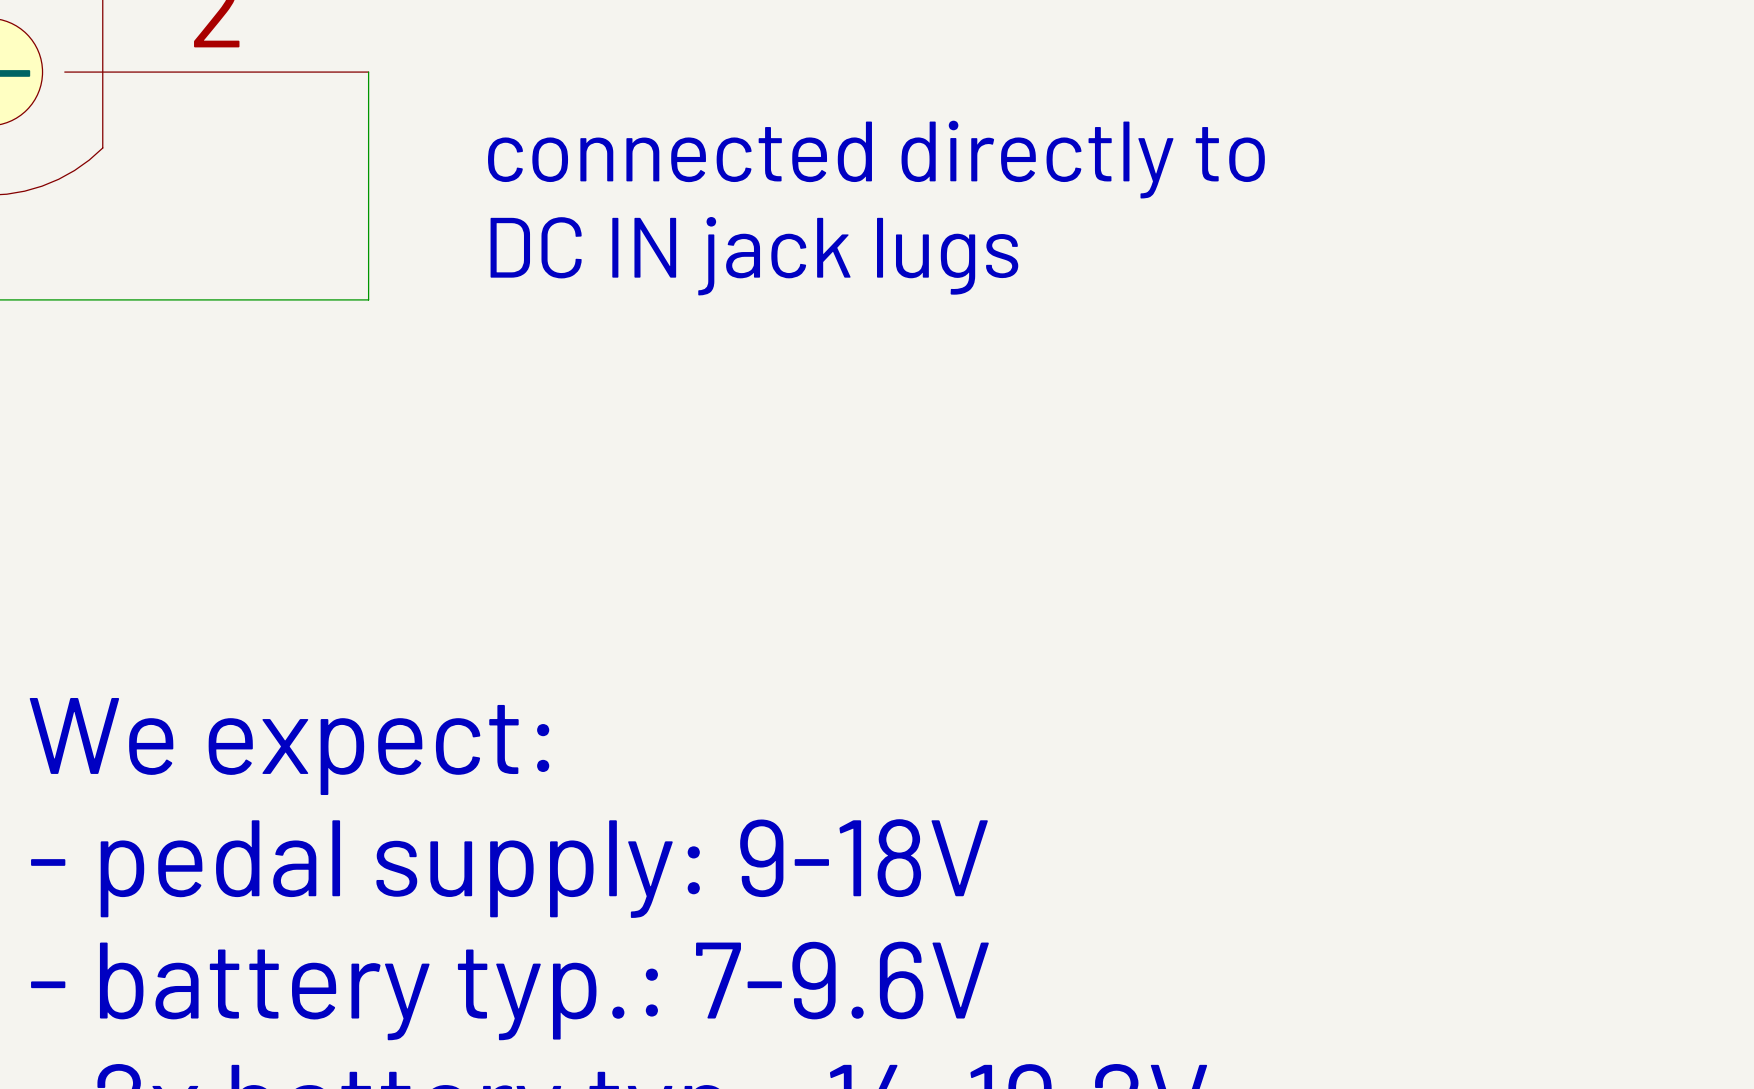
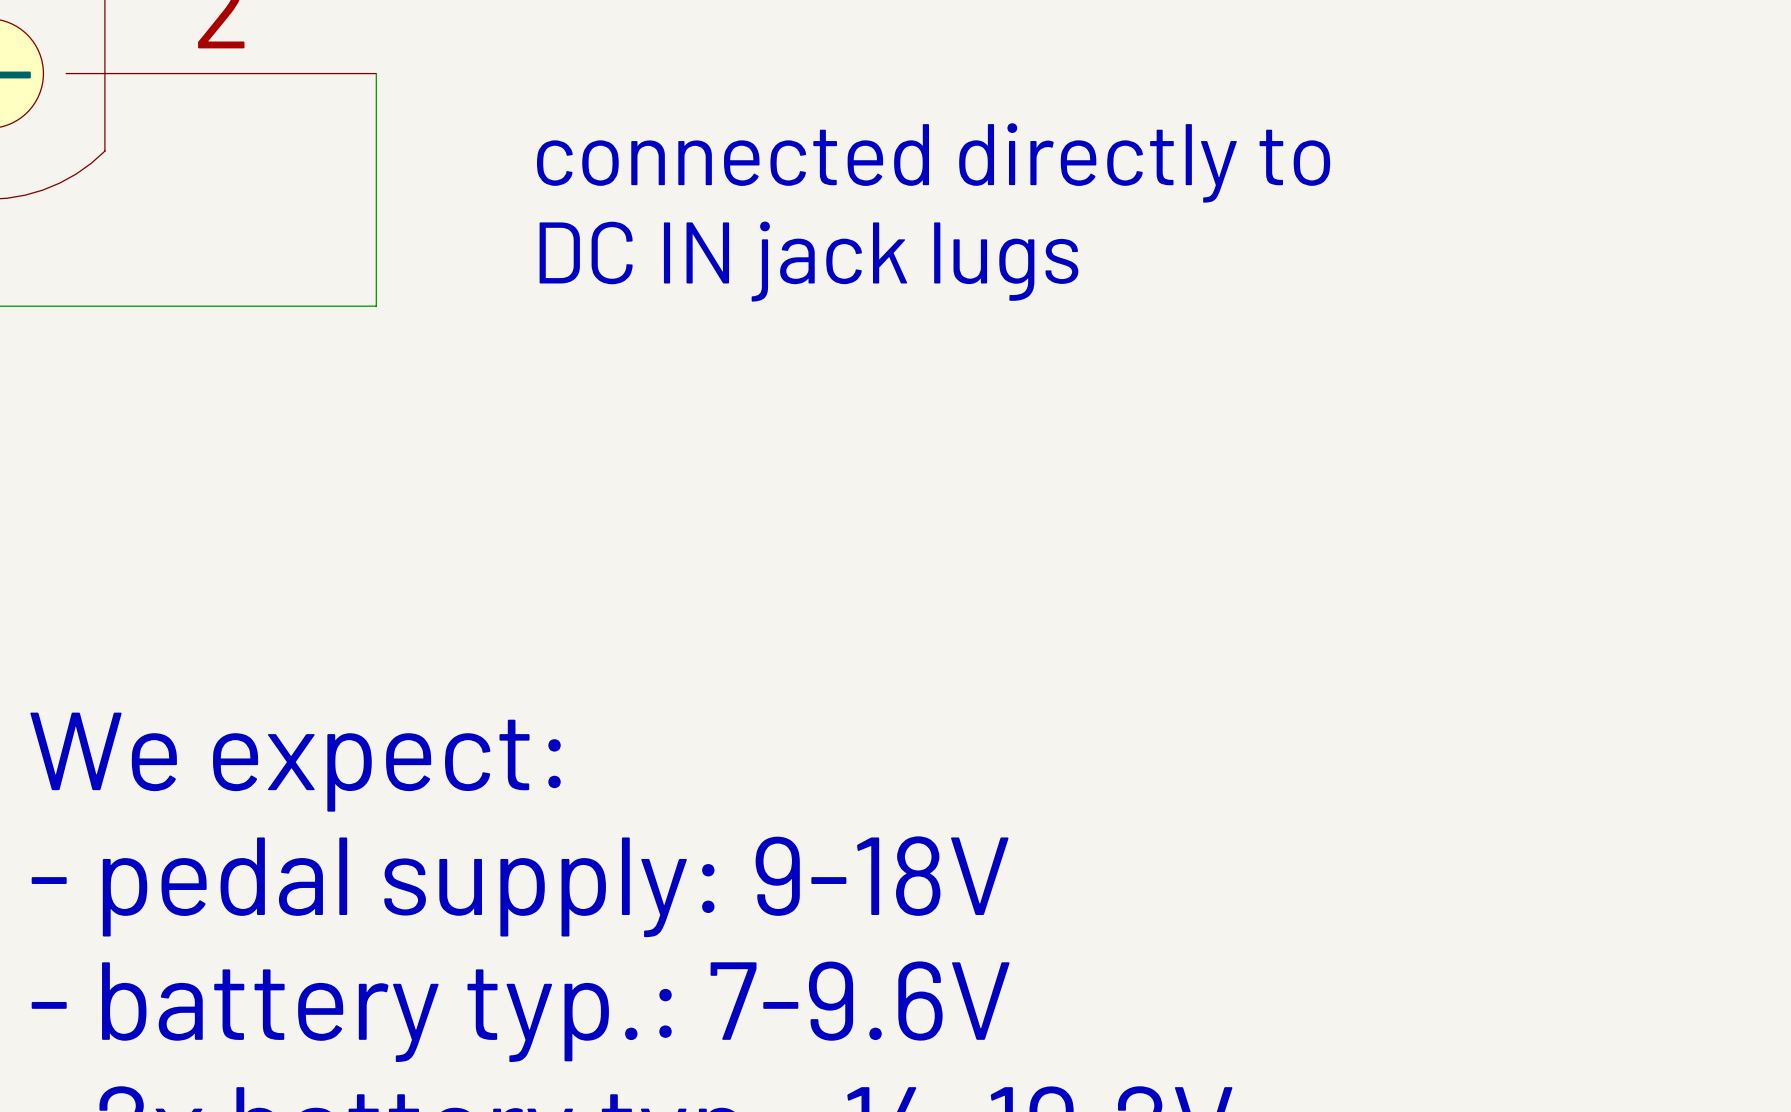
text position: connected directly to (876, 159) -> connected directly to (933, 162)
text position: DC IN jack lugs (754, 256) -> DC IN jack lugs (808, 261)

